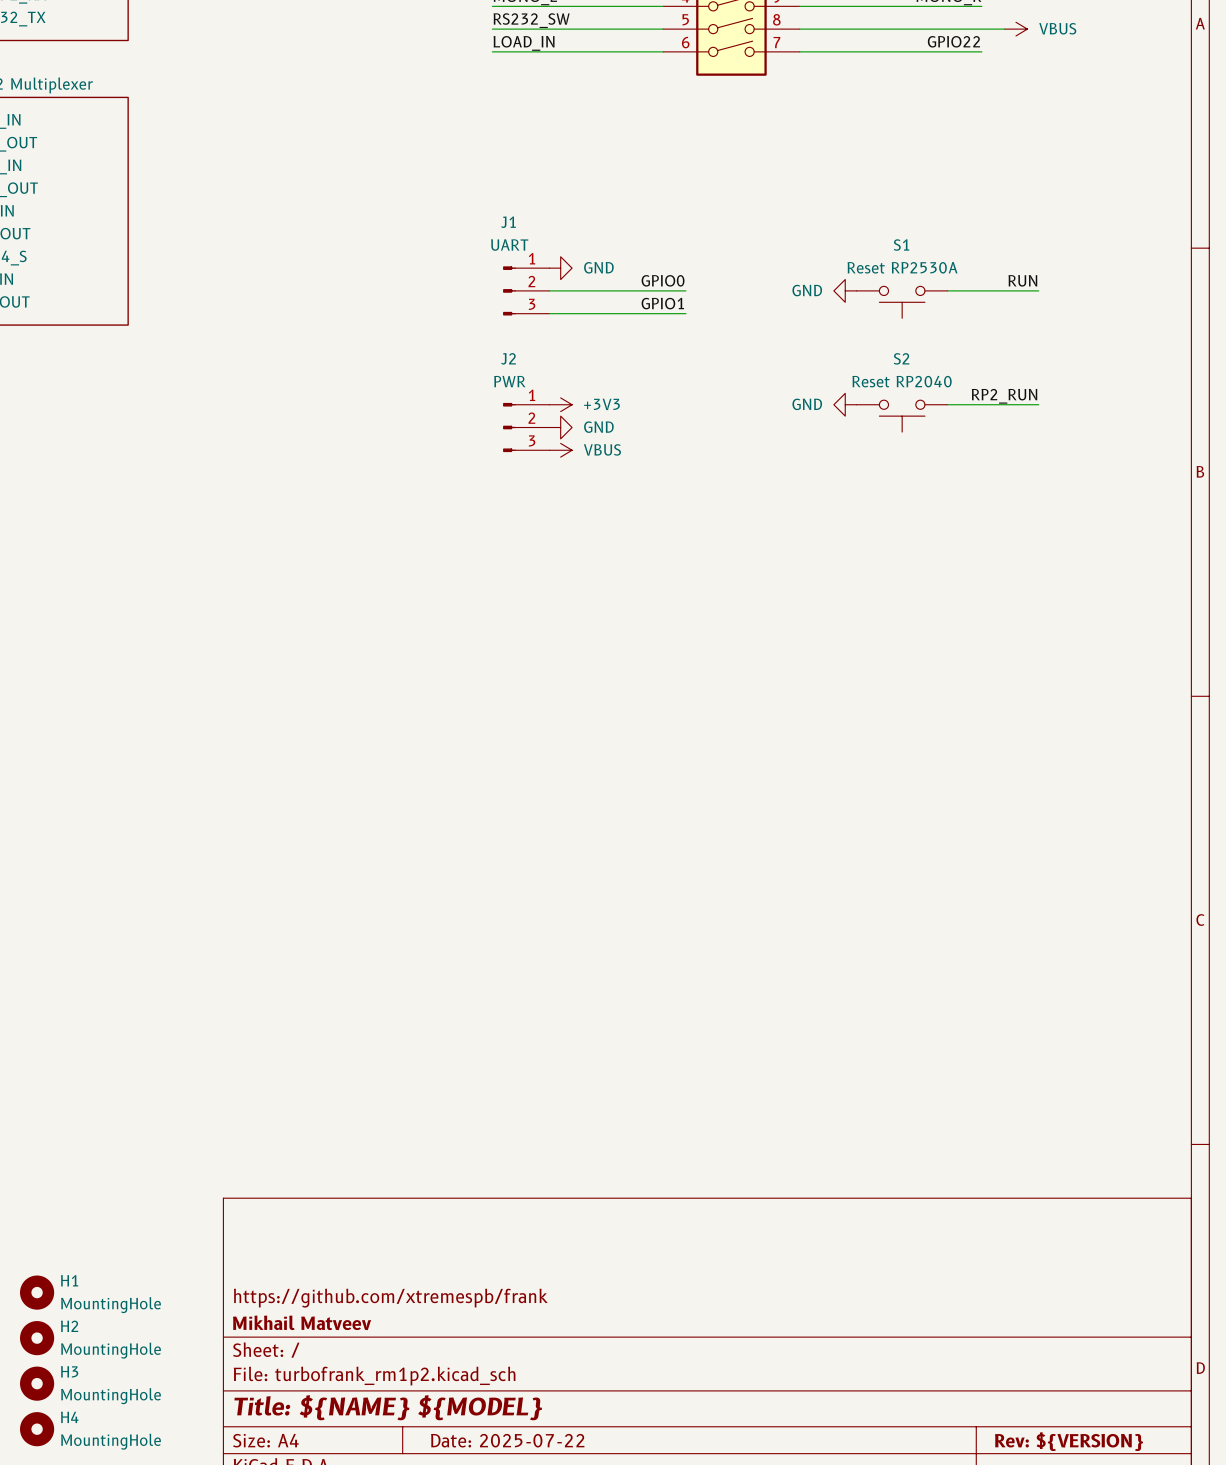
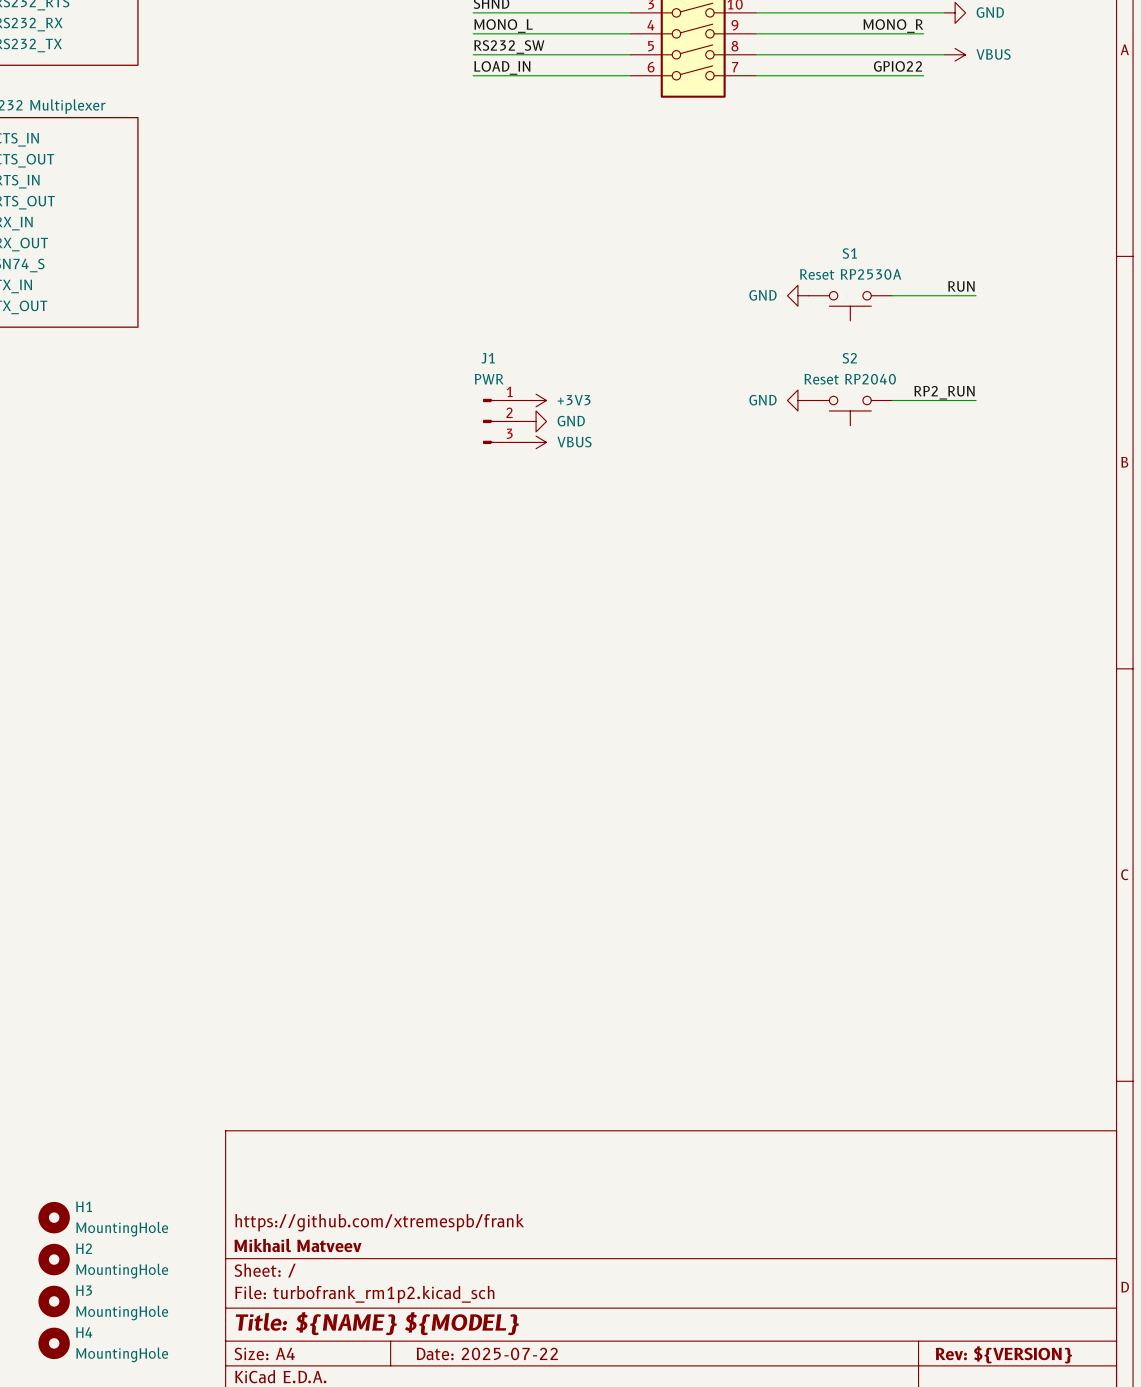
power symbol: GND (560, 268) -> none
label: GPIO0 (663, 280) -> none
J1: UART (526, 290) -> none
wire: (549, 290) (685, 290) -> none
label: GPIO1 (662, 303) -> none
wire: (549, 313) (685, 313) -> none
J2 name: J2 (508, 358) -> J1 (488, 358)

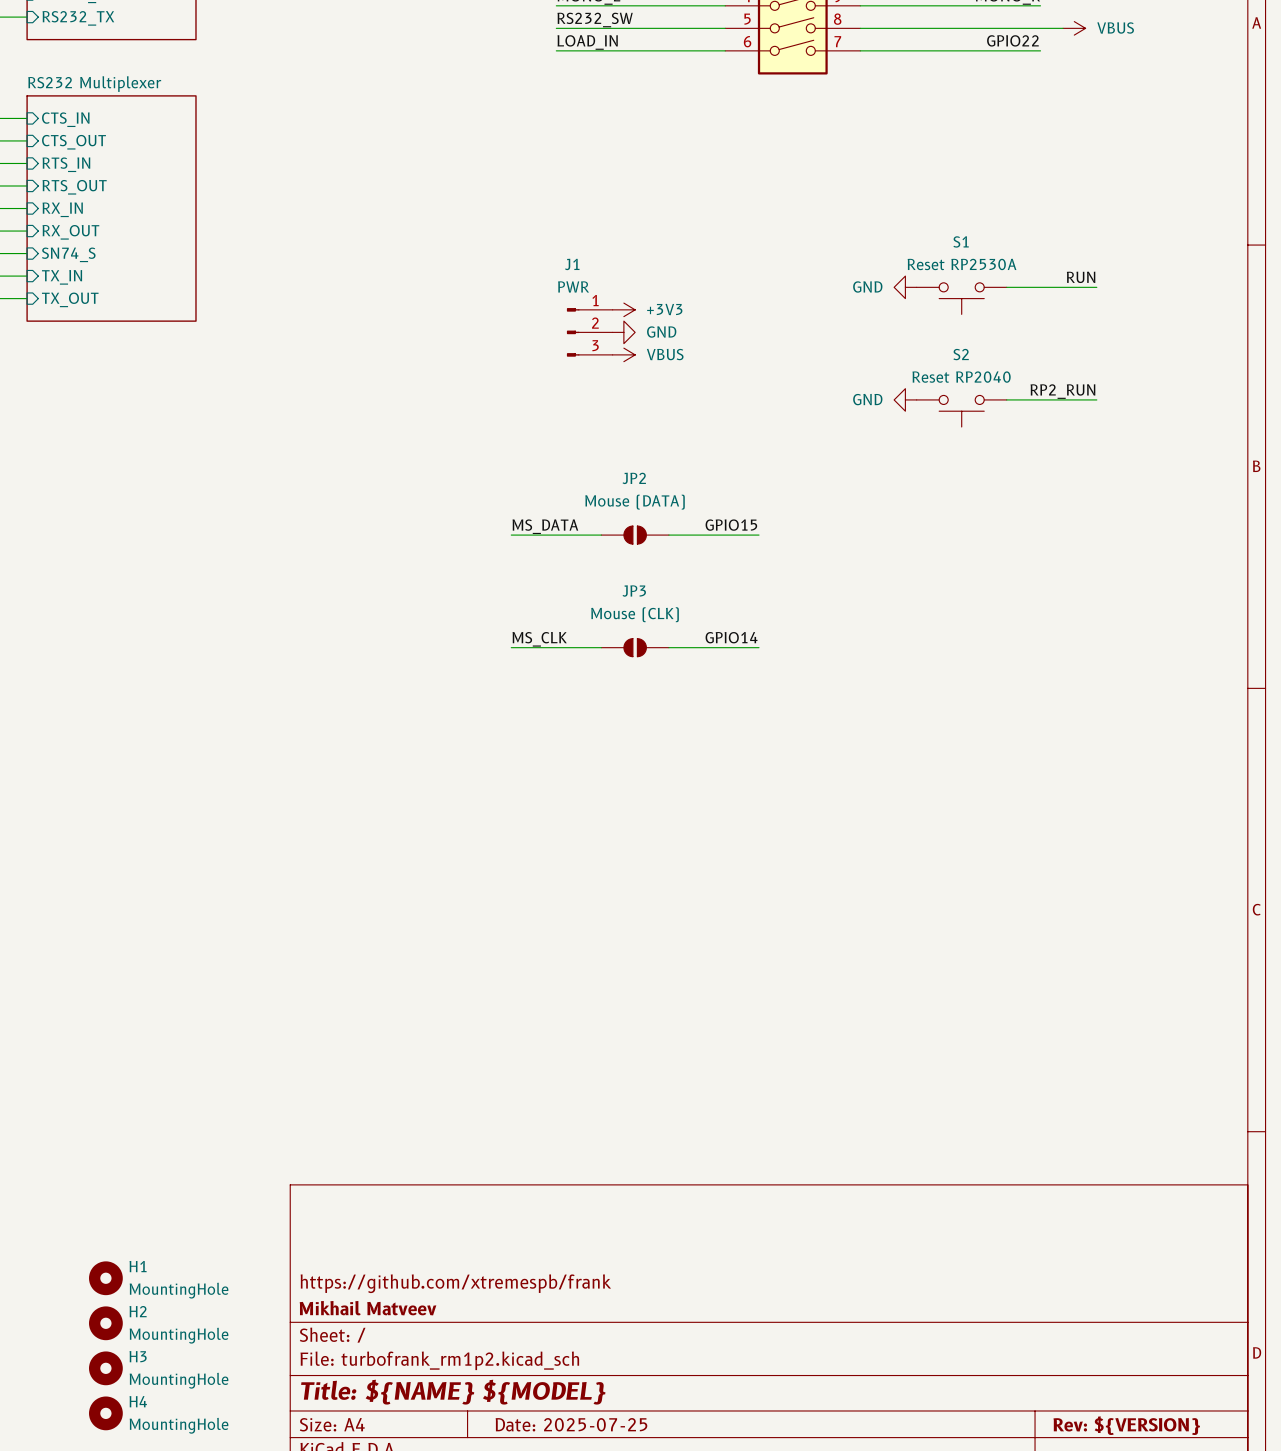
power symbol position: +3V3 (536, 400) -> +3V3 (623, 309)
J1 position: (504, 421) -> (589, 332)
power symbol position: GND (536, 421) -> GND (623, 332)
power symbol position: VBUS (536, 442) -> VBUS (623, 354)
label: none -> GPIO15 (731, 525)
label: none -> MS_DATA (545, 526)
wire: none -> (511, 535) (601, 535)
JP2: none -> Mouse (DATA) (635, 535)
wire: none -> (668, 535) (759, 535)
label: none -> GPIO14 (731, 637)
label: none -> MS_CLK (539, 639)
wire: none -> (511, 647) (601, 647)
JP3: none -> Mouse (CLK) (635, 647)
wire: none -> (668, 647) (759, 647)
title block: Date: 2025-07-22 (487, 1353) -> Date: 2025-07-25 (571, 1424)

